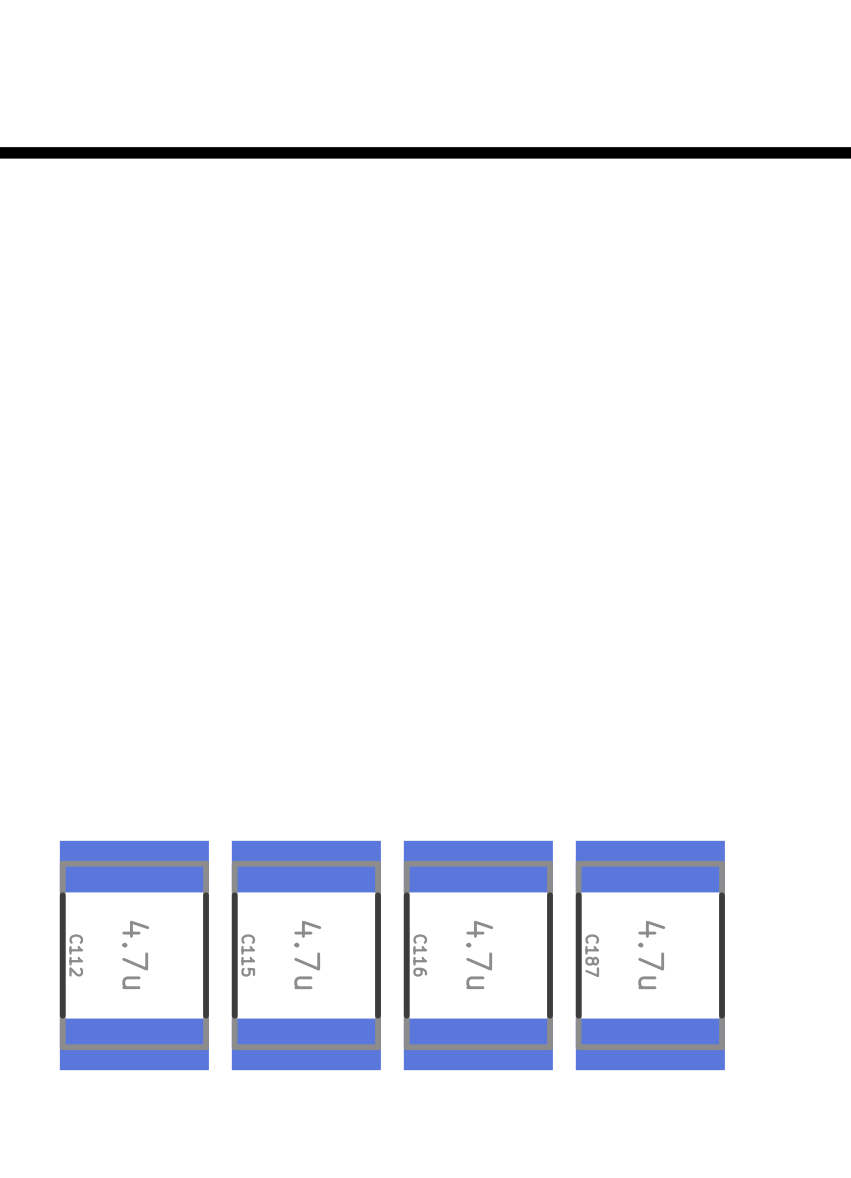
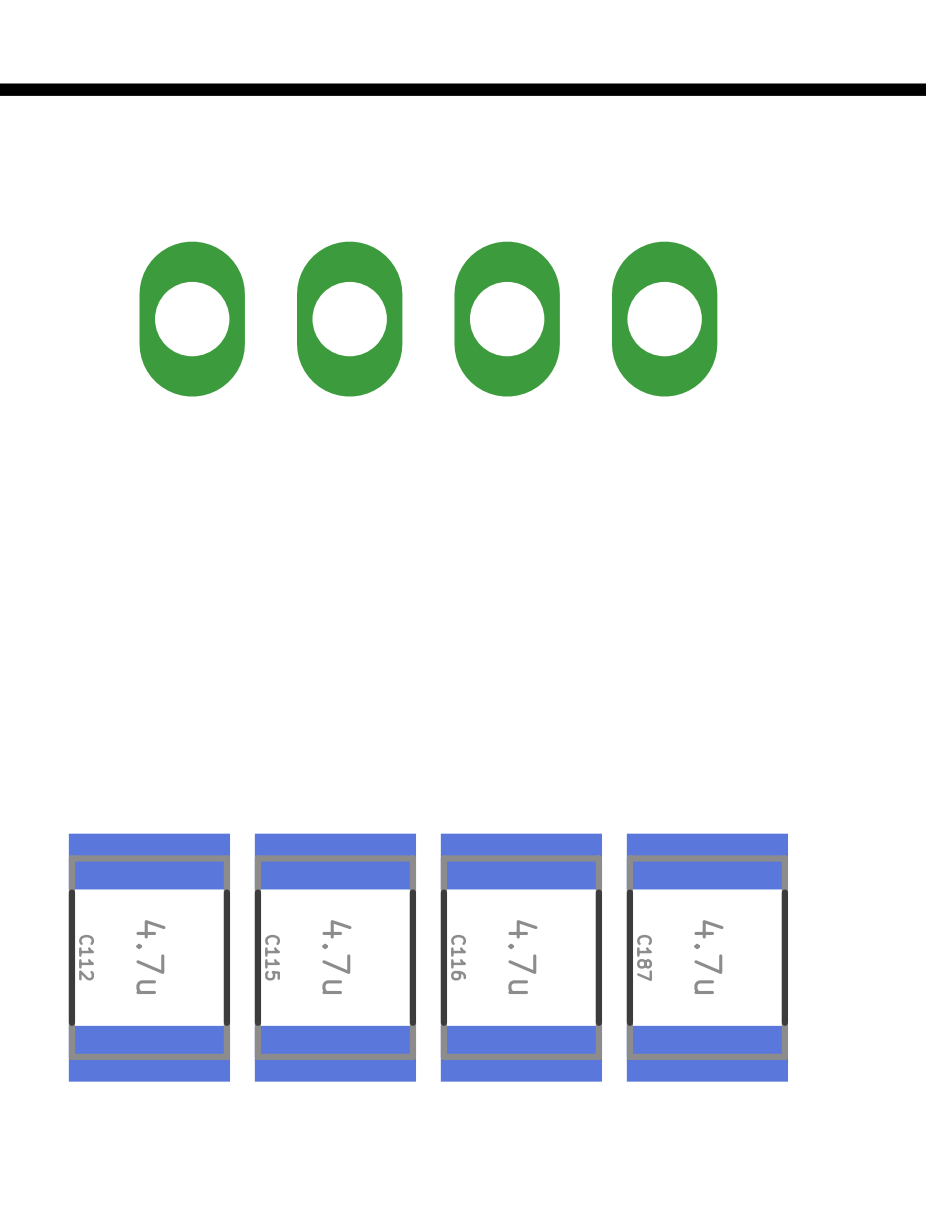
part: none -> (428, 319)

